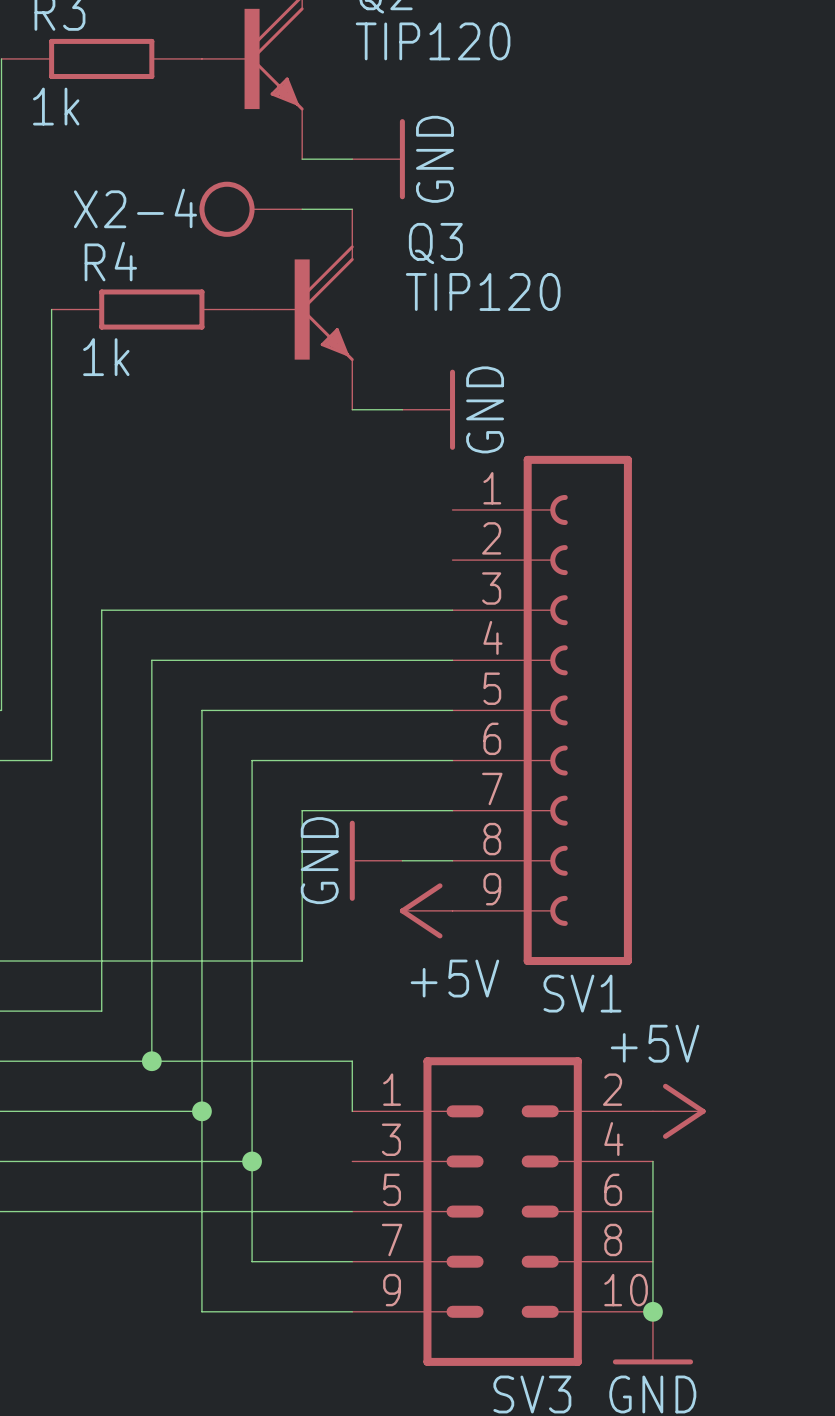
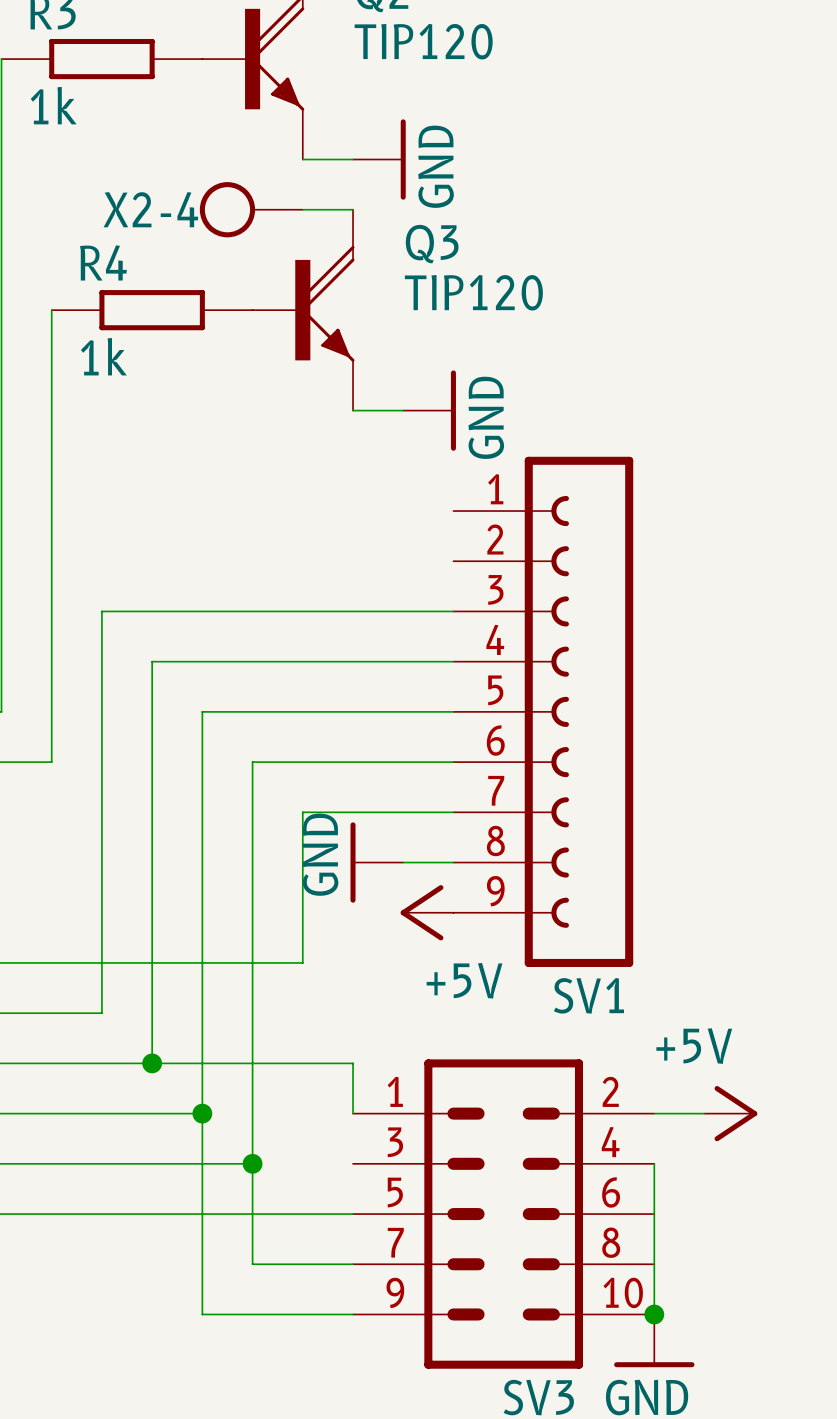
power symbol position: +5V (679, 1111) -> +5V (730, 1113)

